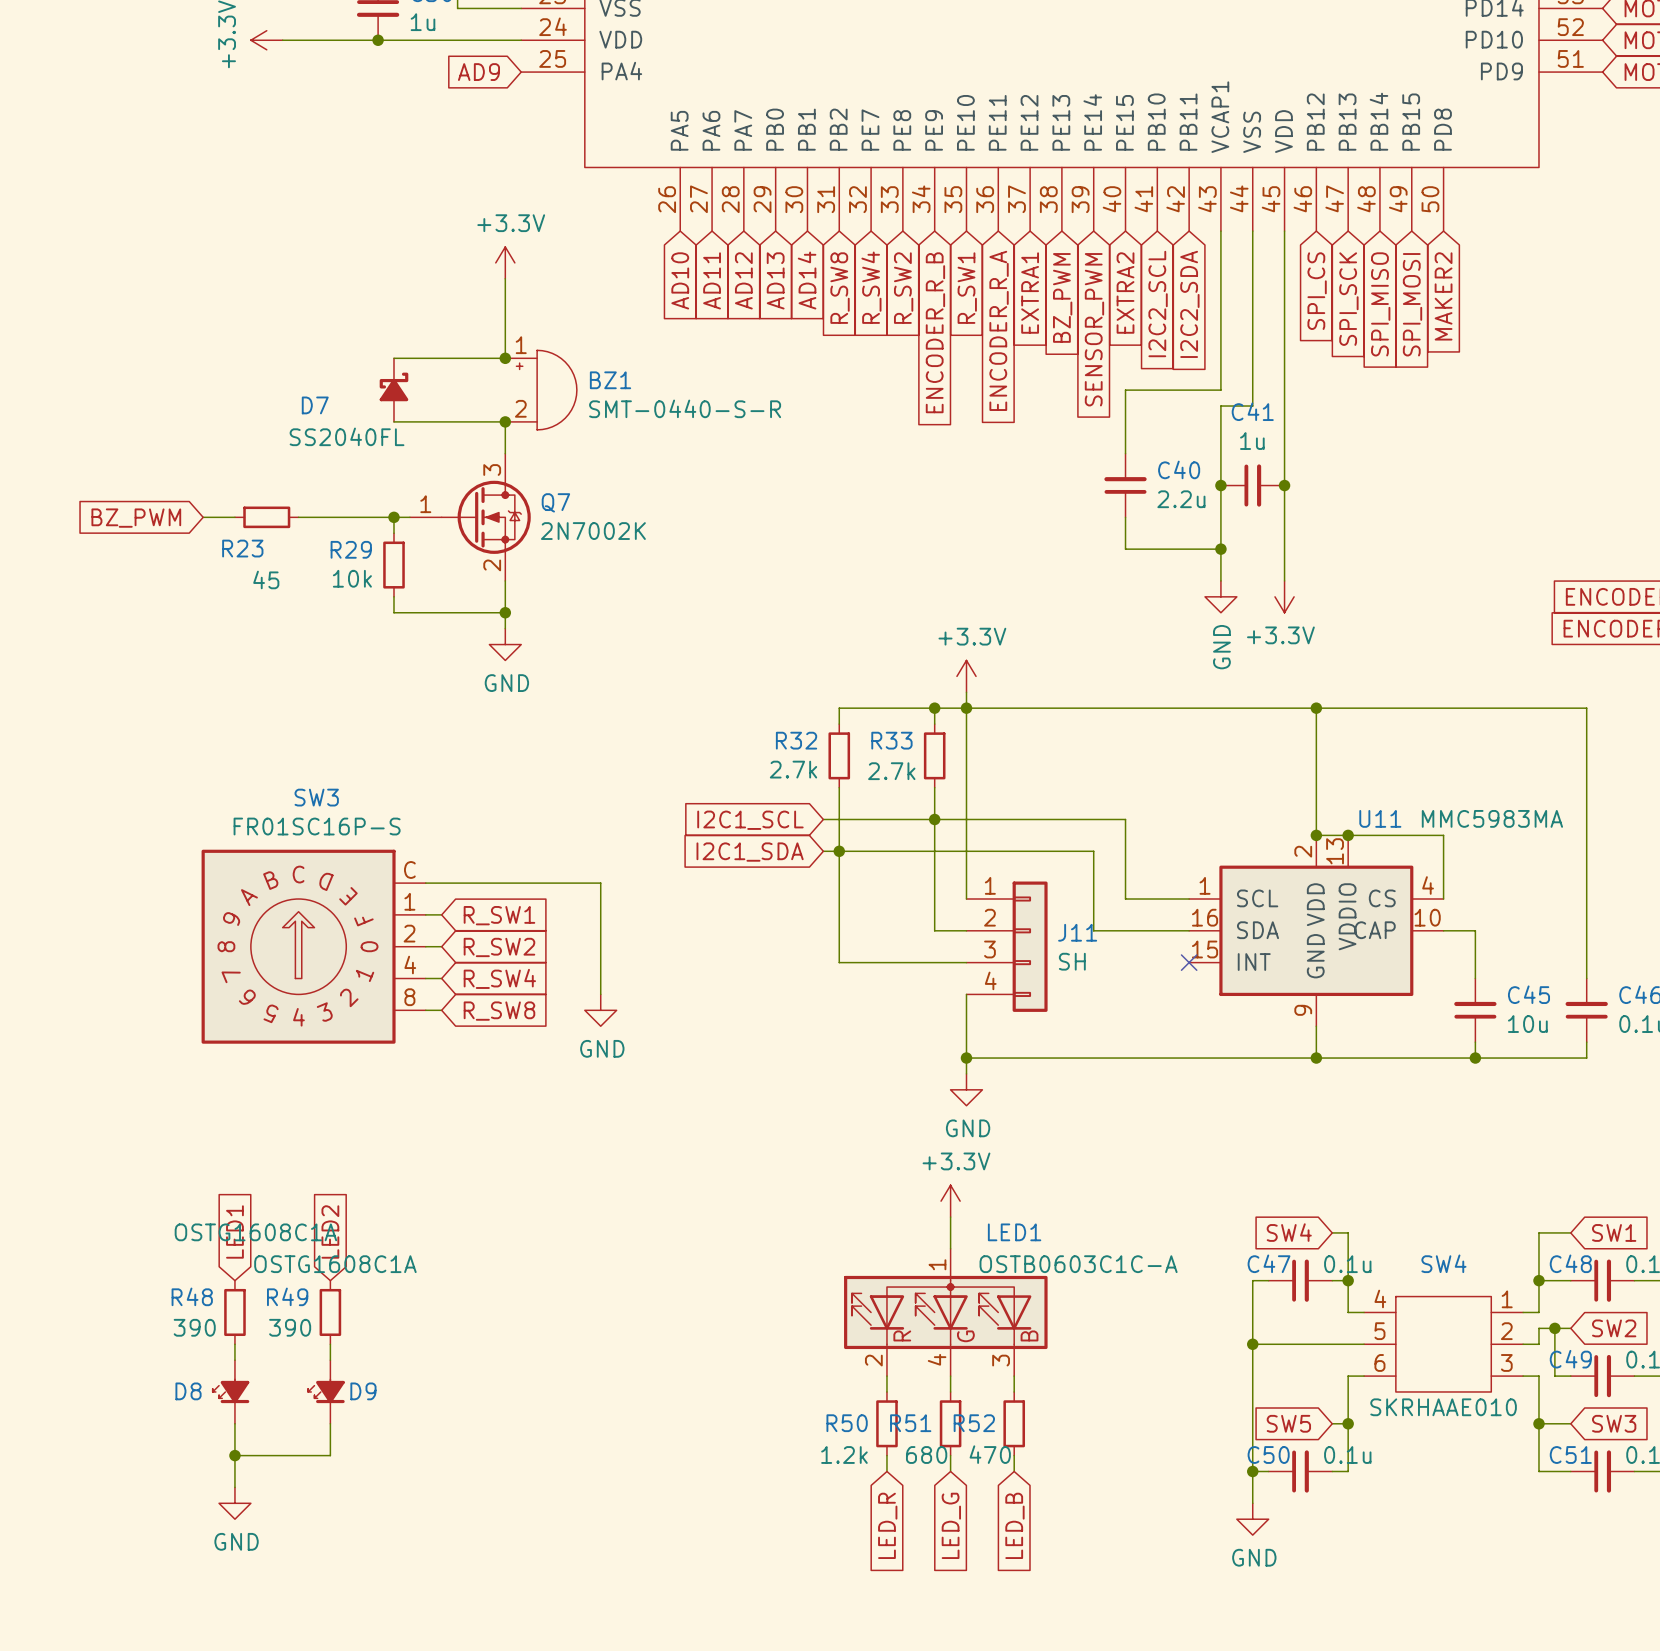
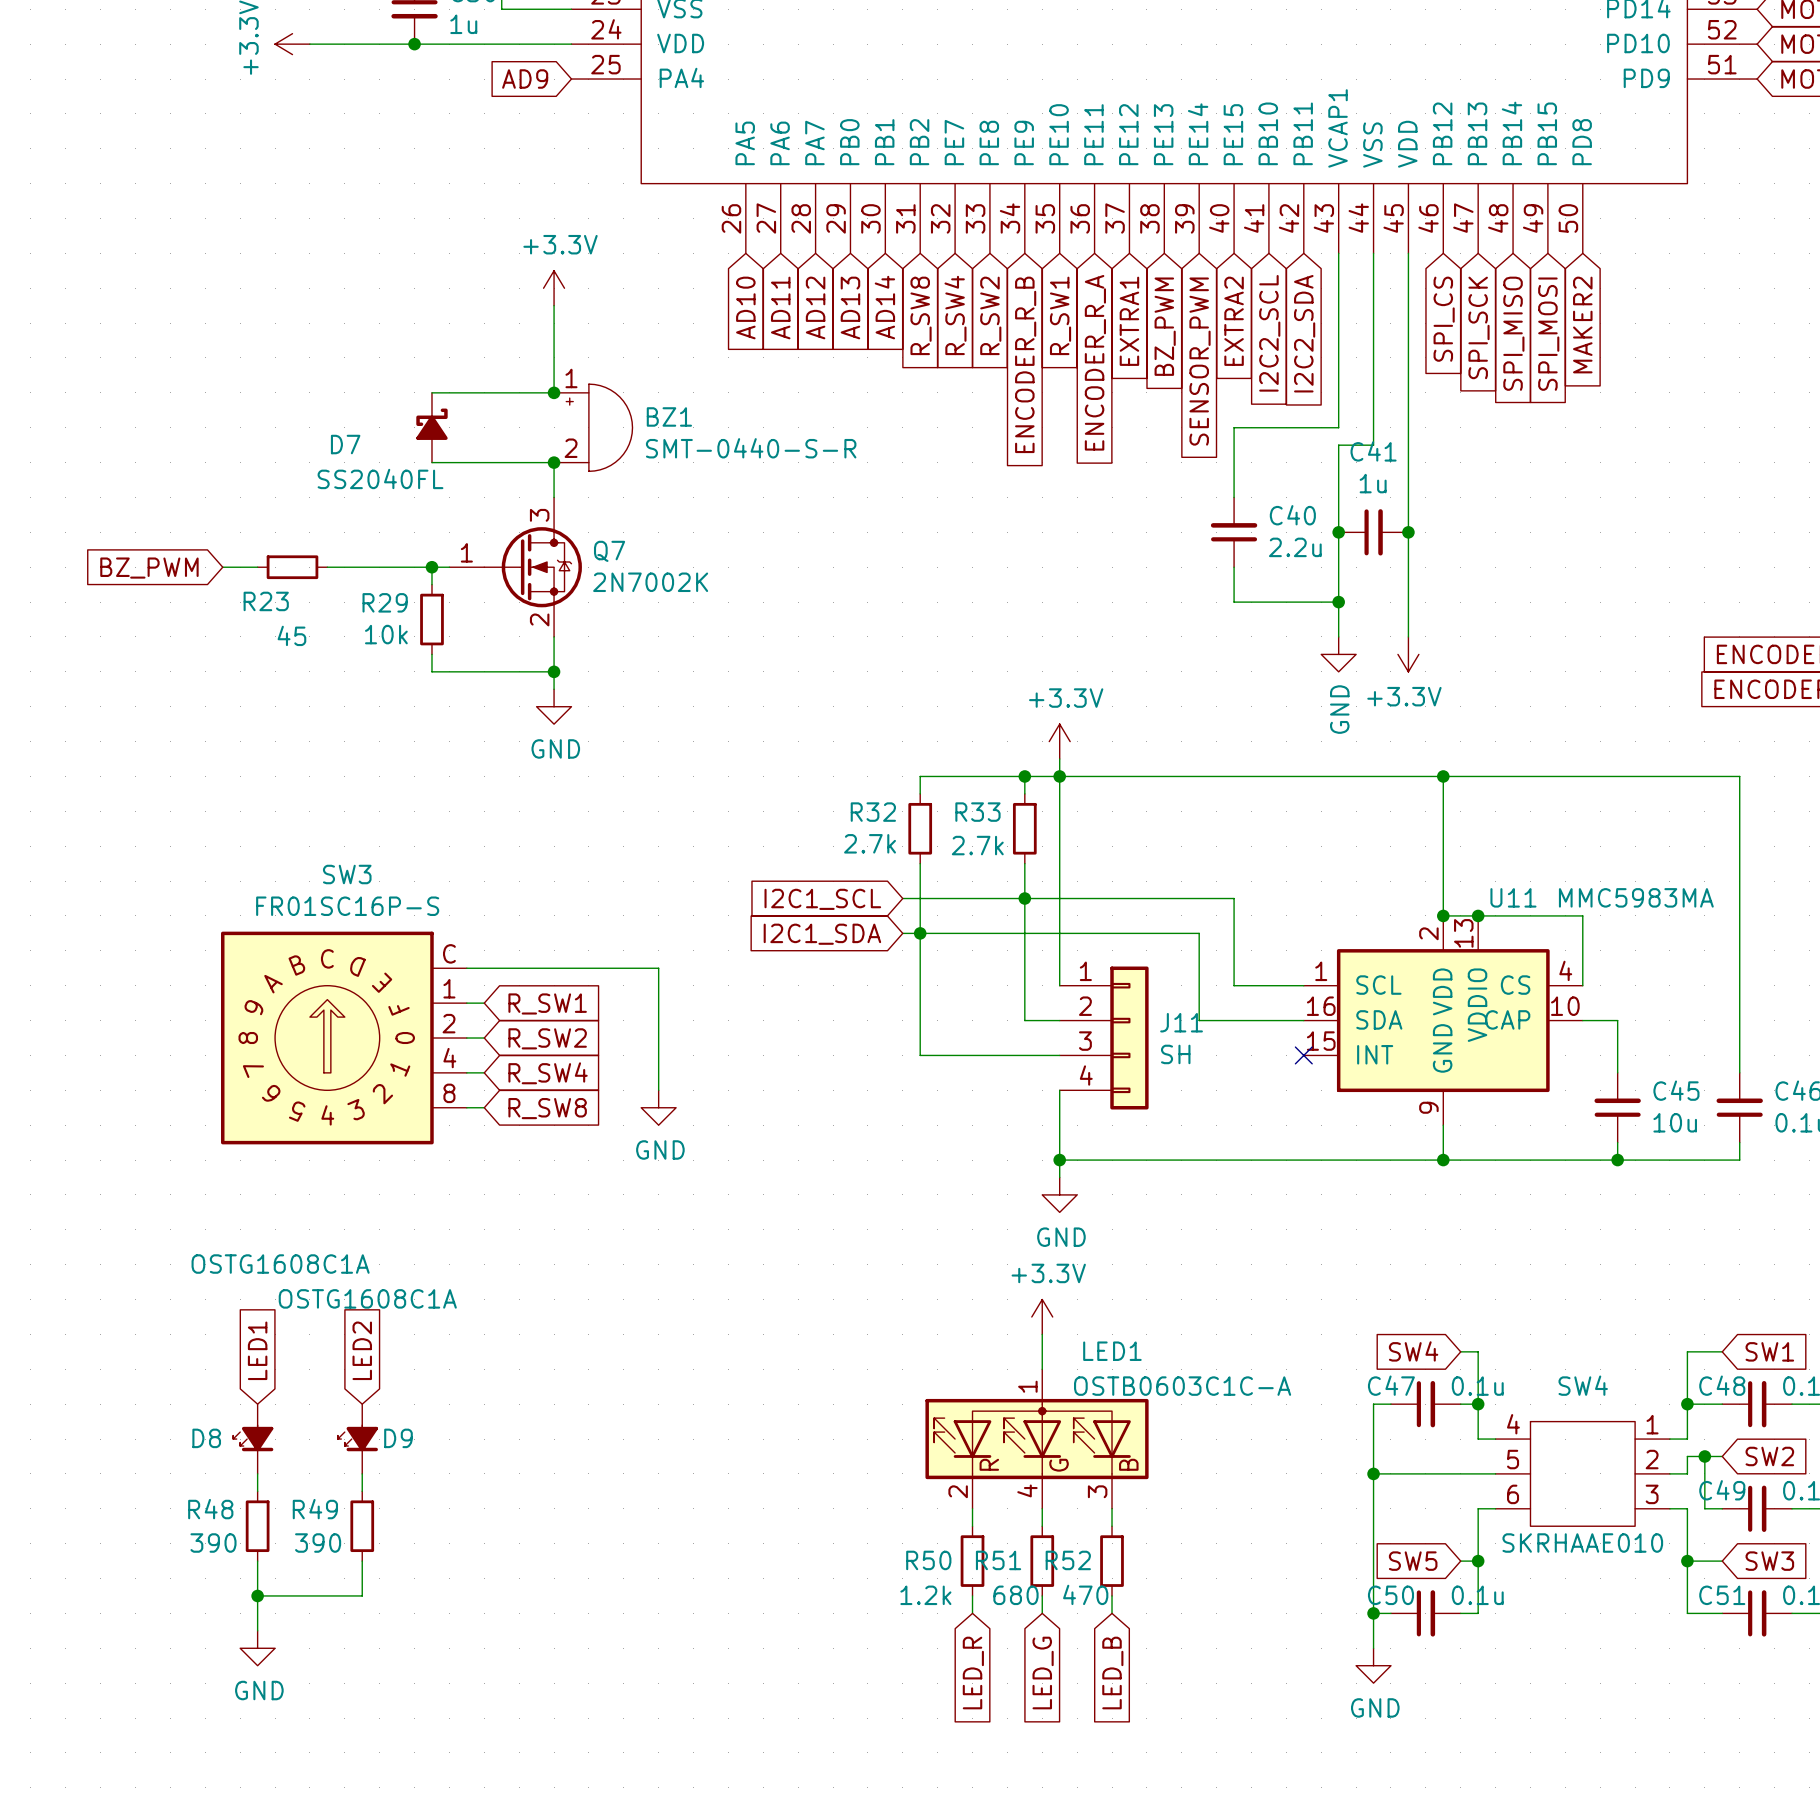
R48 position: (234, 1312) -> (257, 1526)
R49 position: (330, 1312) -> (362, 1526)
D8 position: (230, 1391) -> (253, 1439)
D9 position: (326, 1391) -> (357, 1439)

